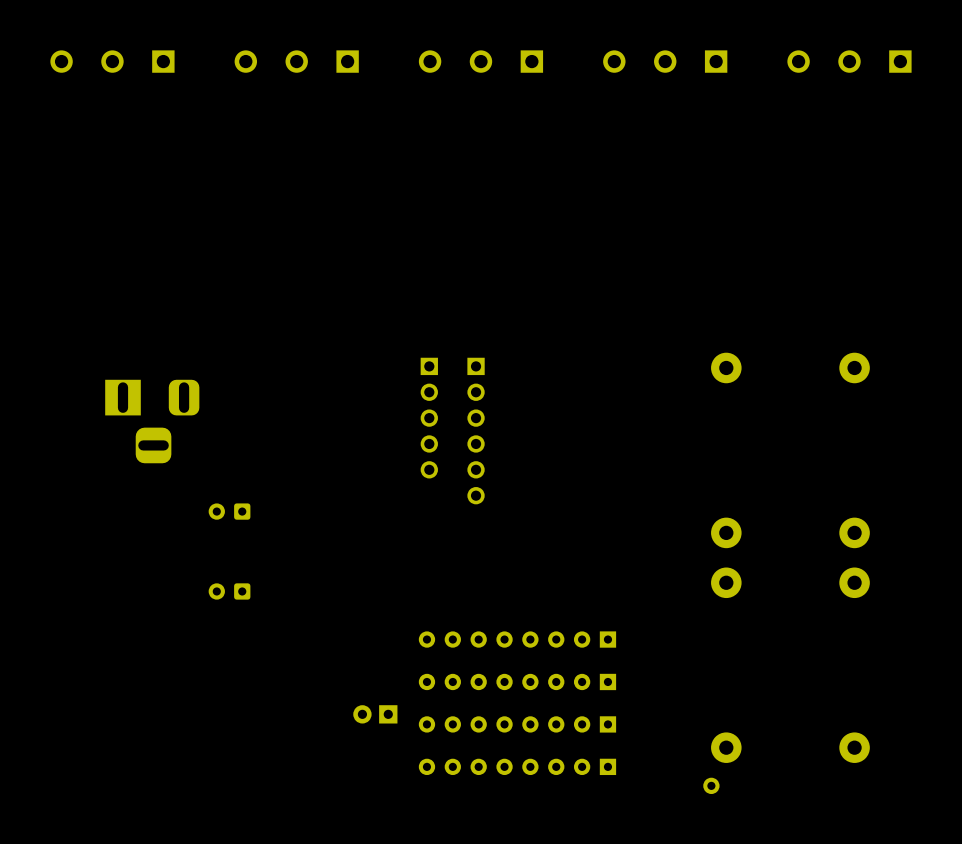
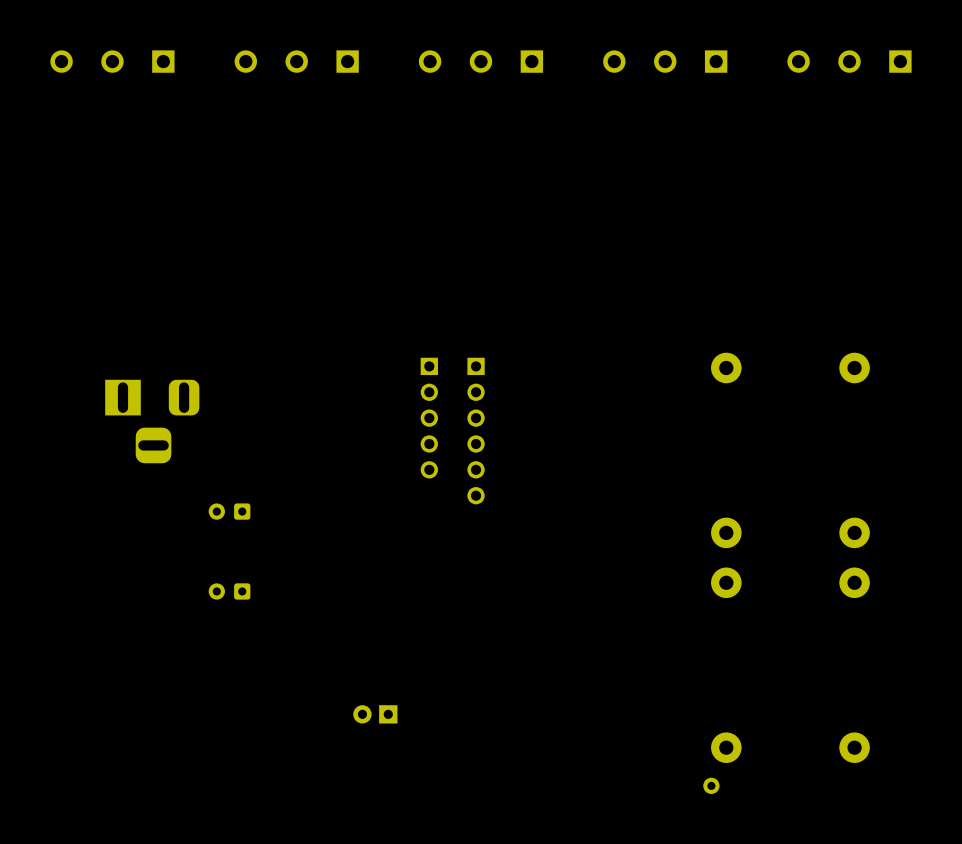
part: (517, 639) -> none
part: (517, 681) -> none
part: (517, 724) -> none
part: (517, 766) -> none

